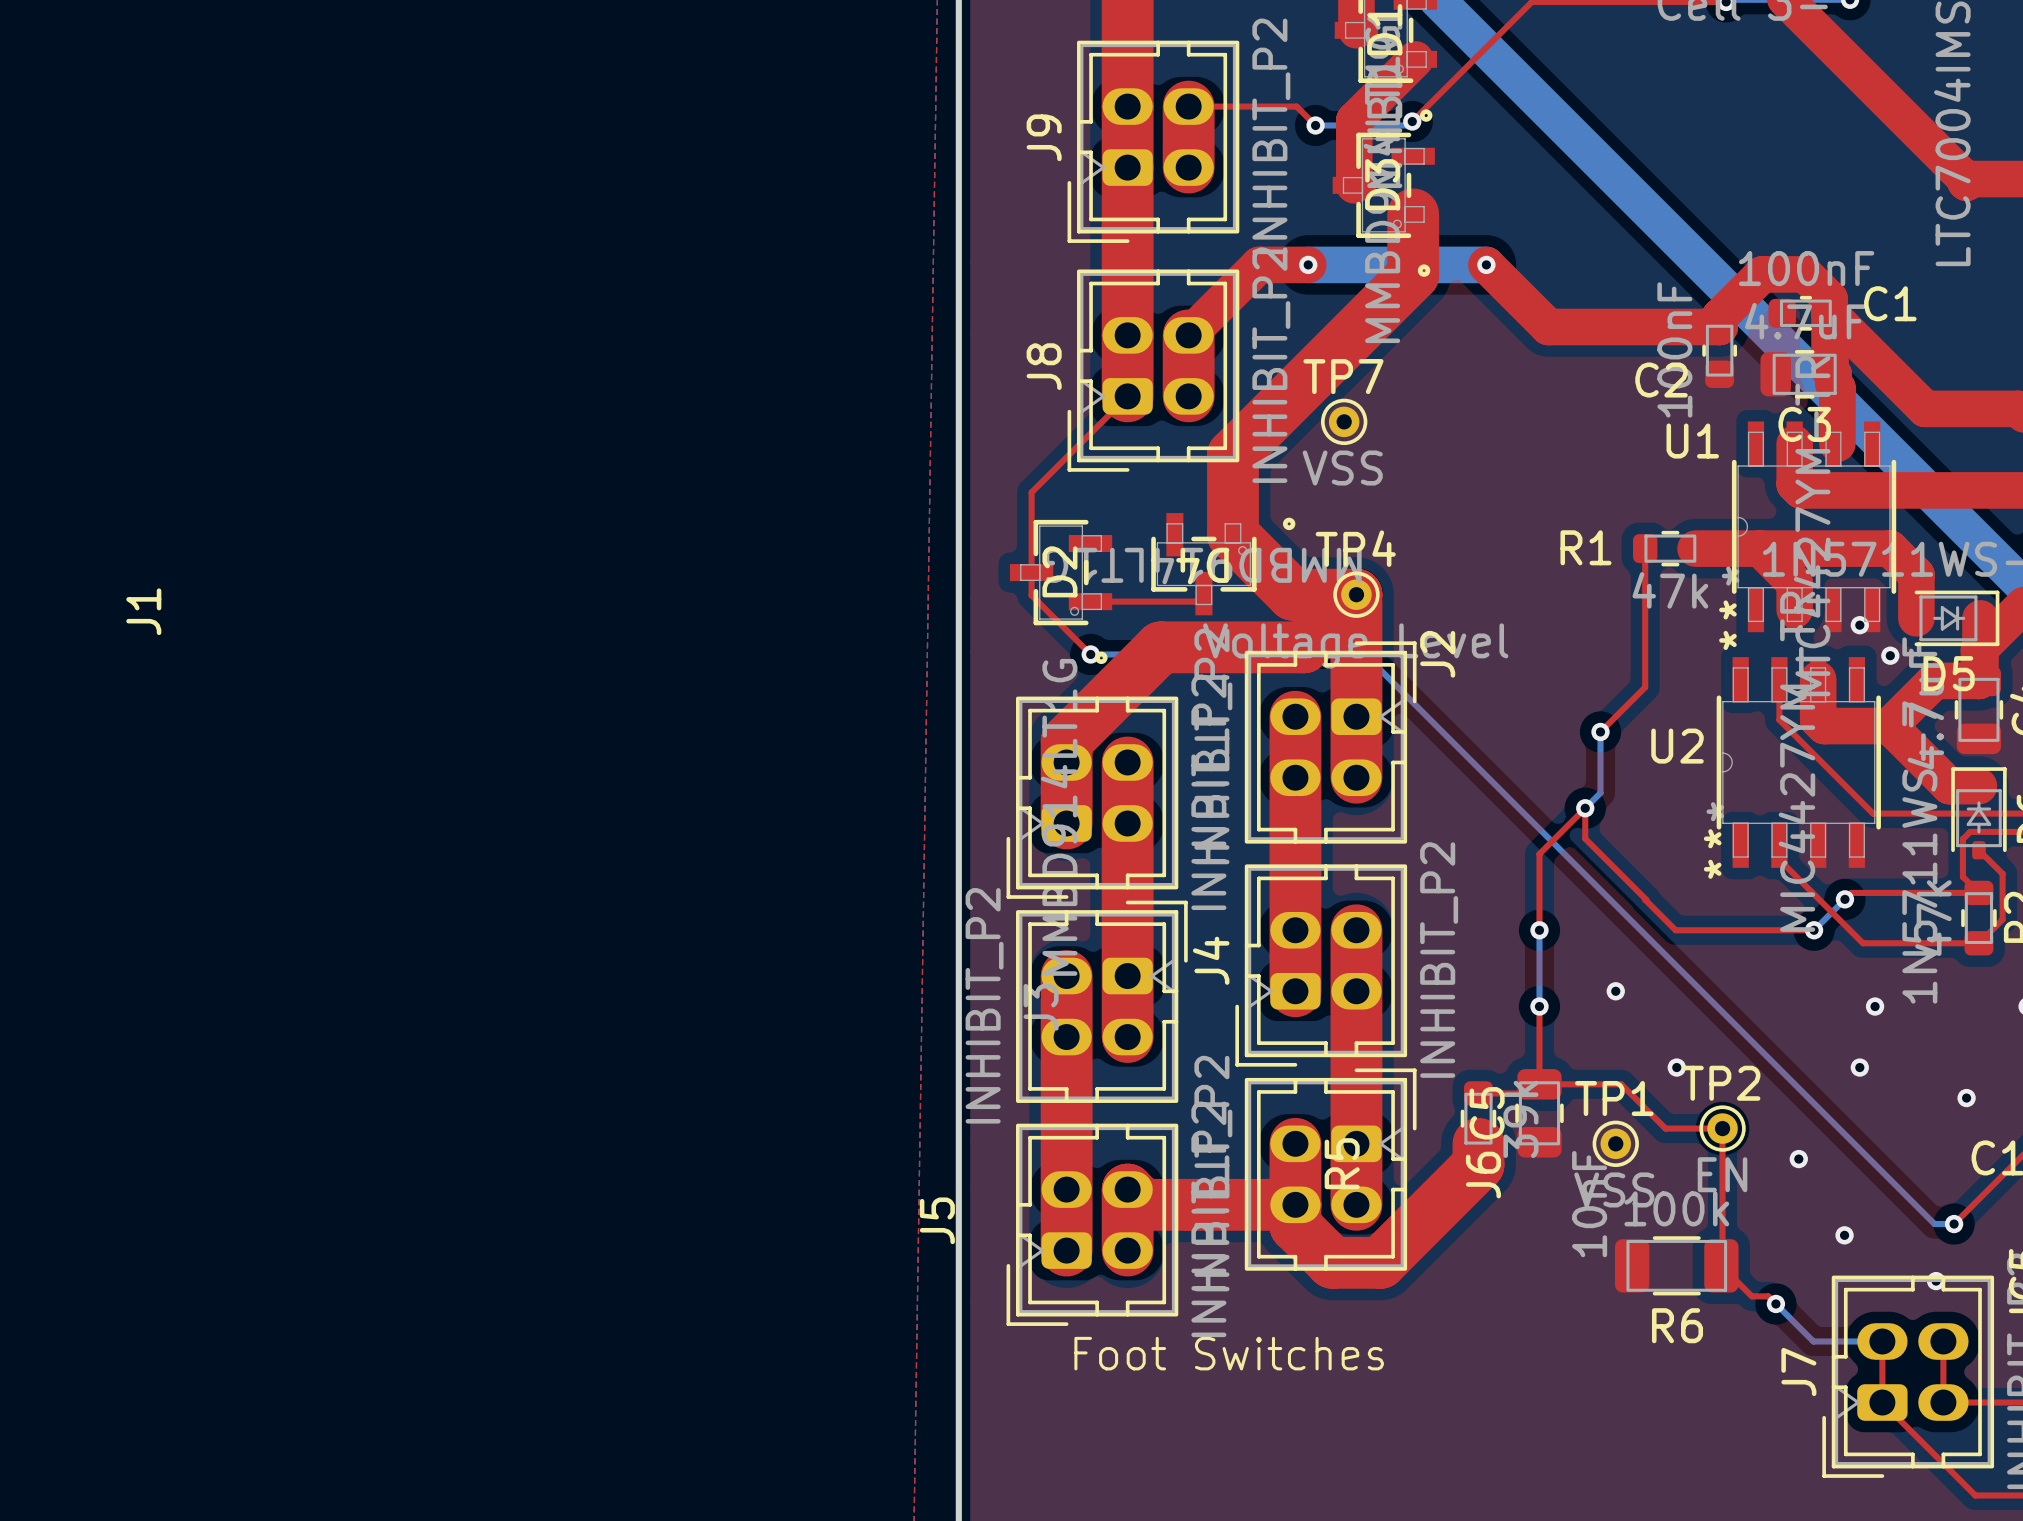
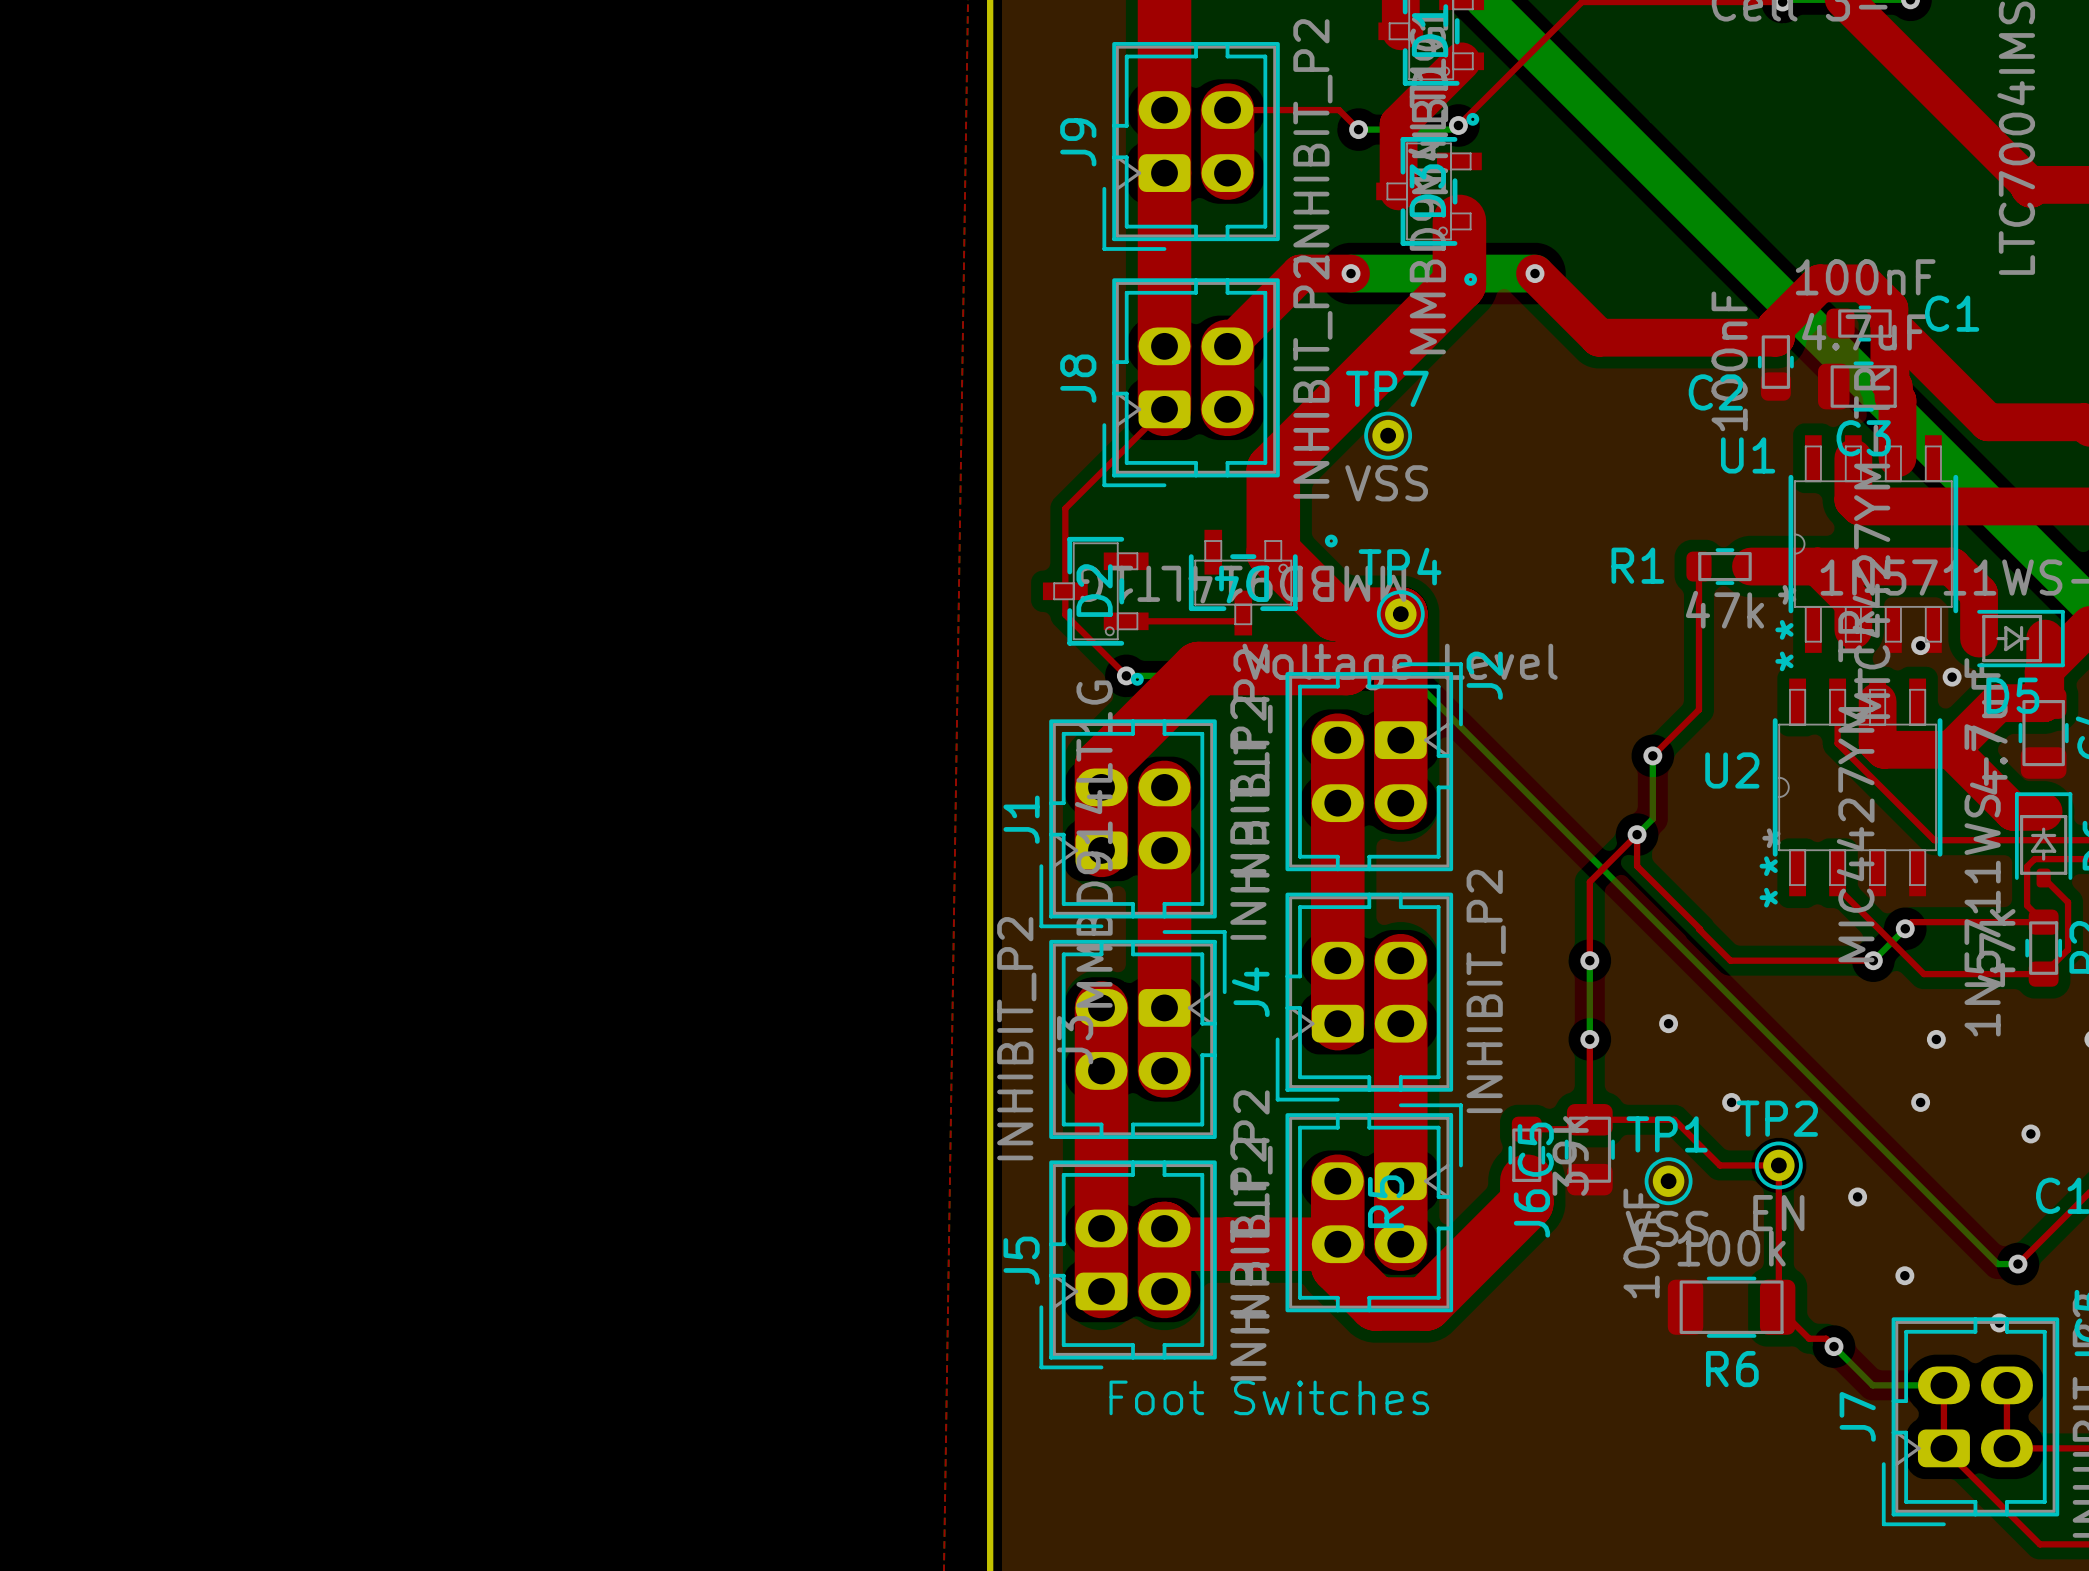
J1 name position: J1 (143, 611) -> J1 (1021, 819)
J5 name position: J5 (937, 1220) -> J5 (1021, 1260)

